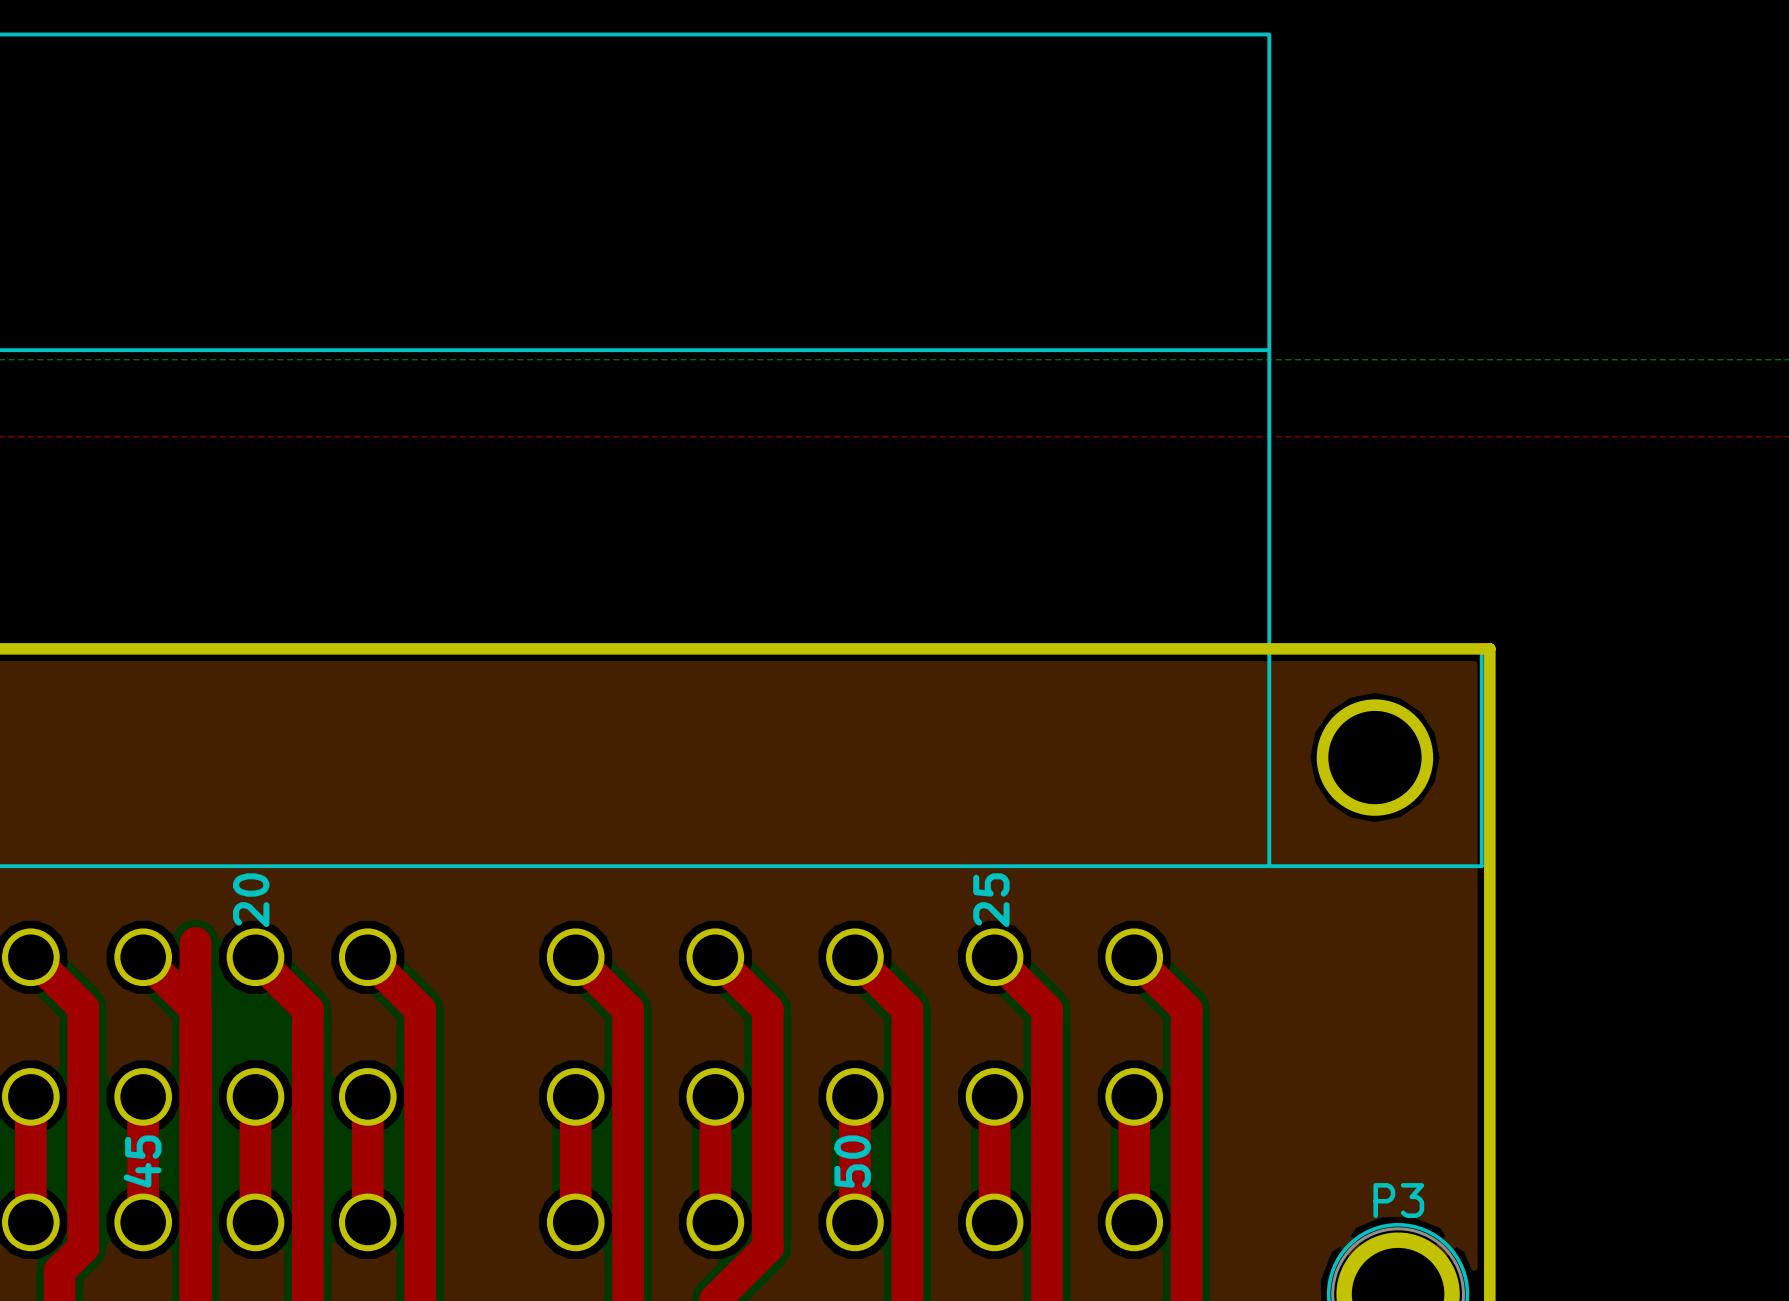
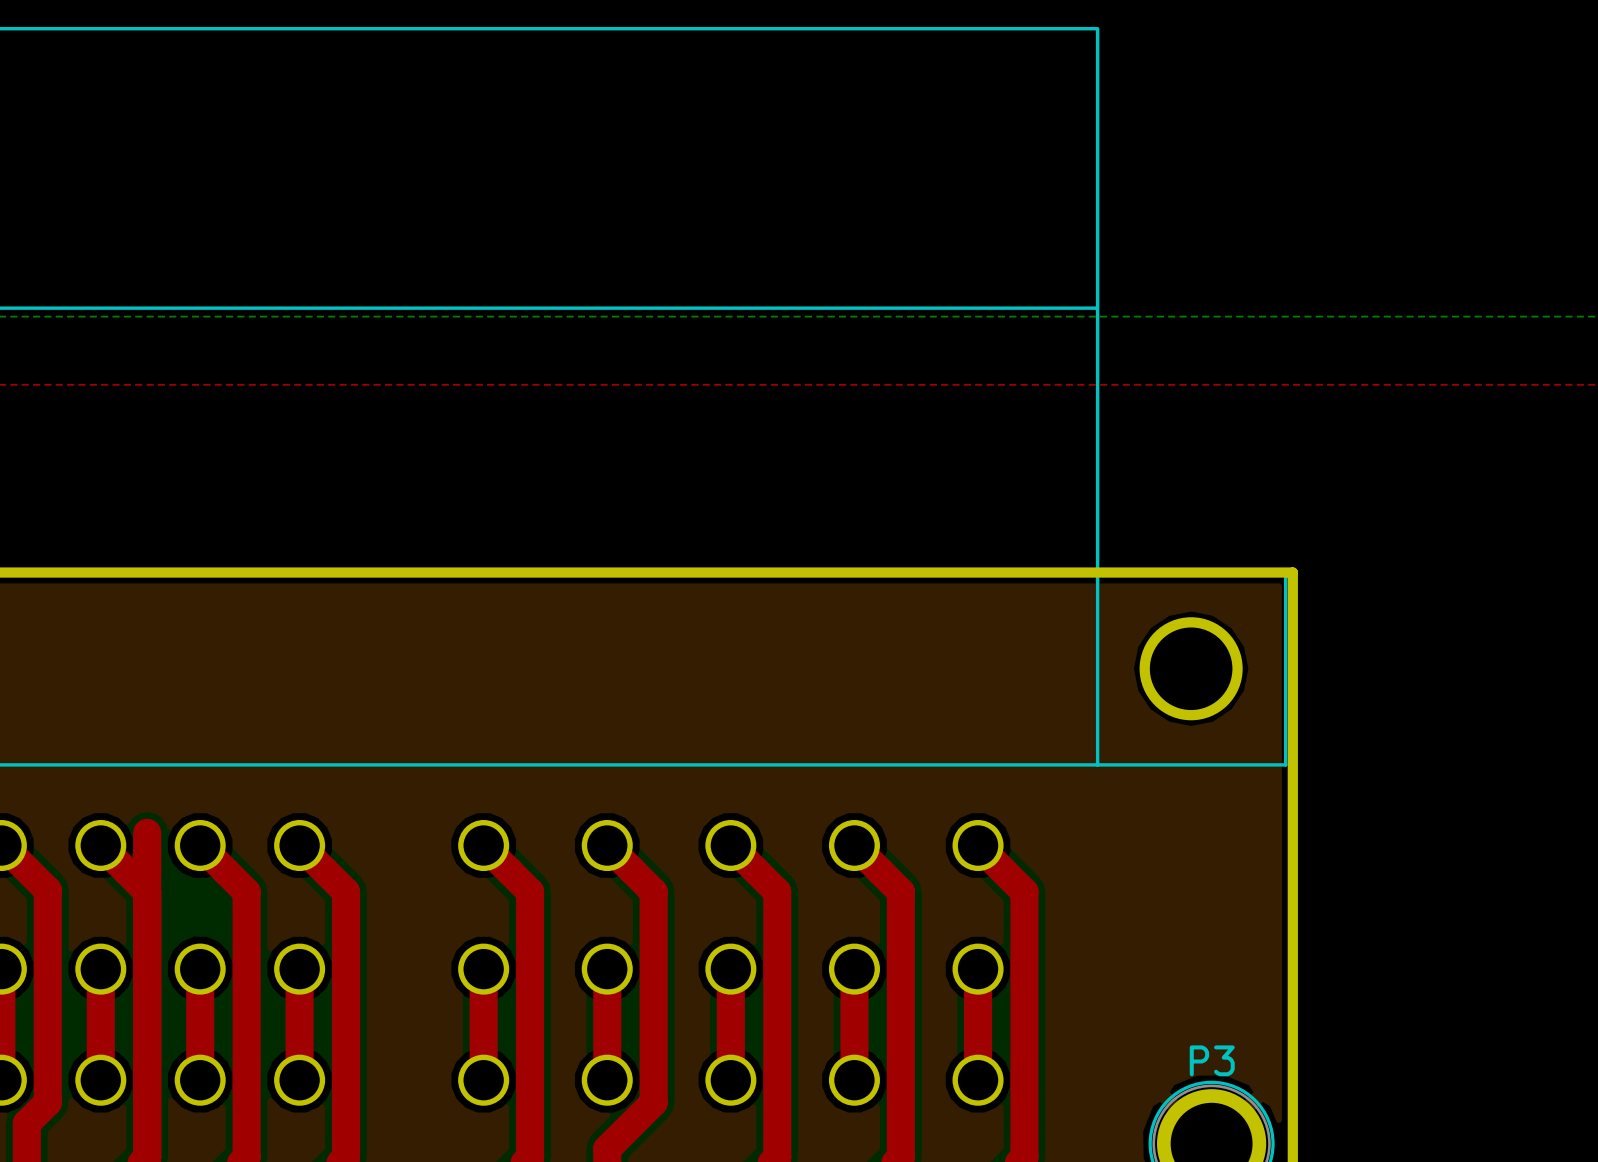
text: 20 (251, 900) -> none
text: 25 (991, 900) -> none
text: 45 (142, 1161) -> none
text: 50 (852, 1161) -> none

